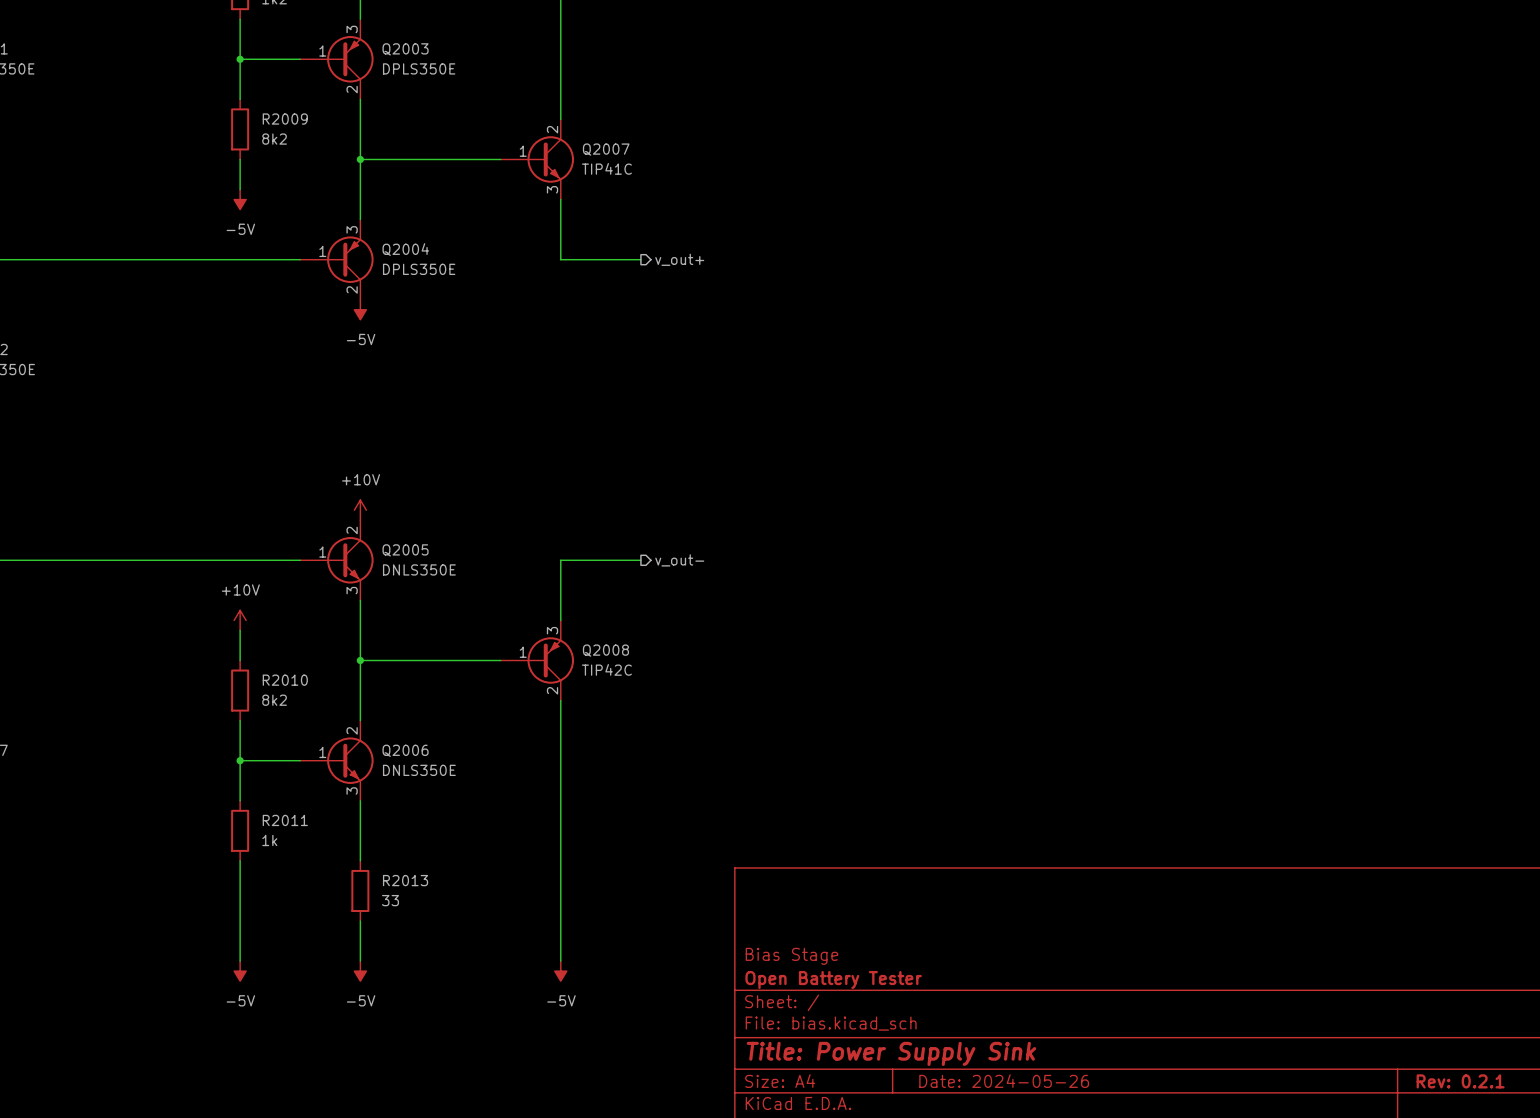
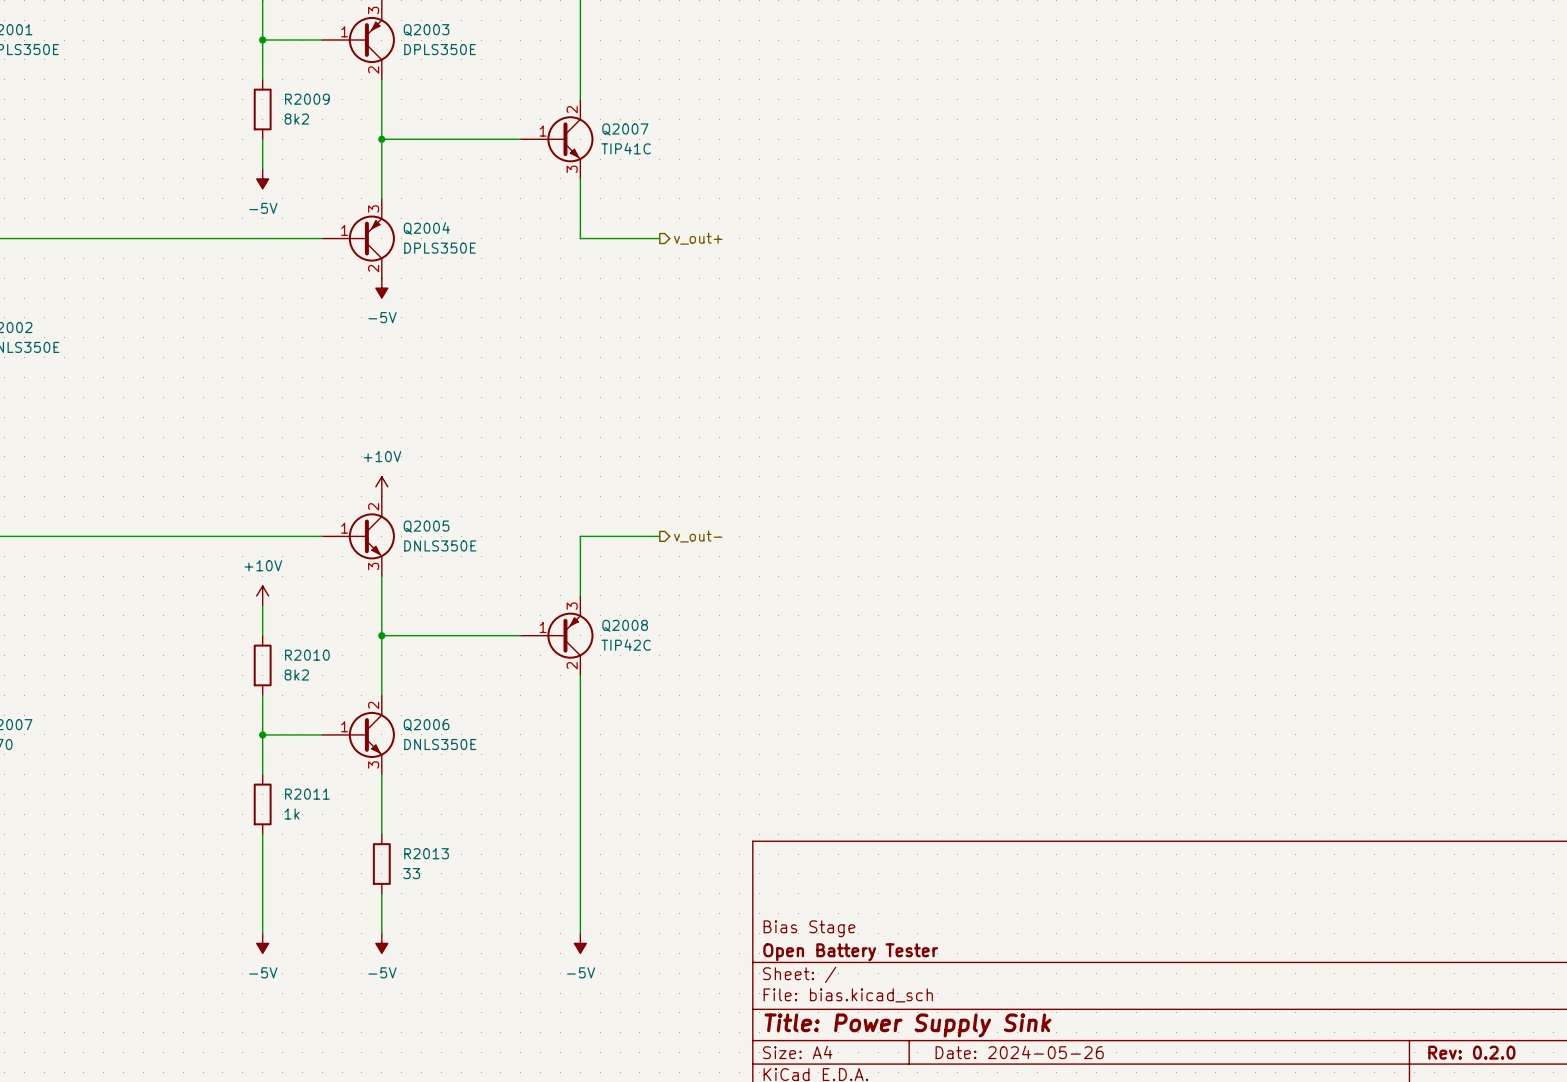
title block: Rev: 0.2.1 (1460, 1081) -> Rev: 0.2.0 (1471, 1052)

